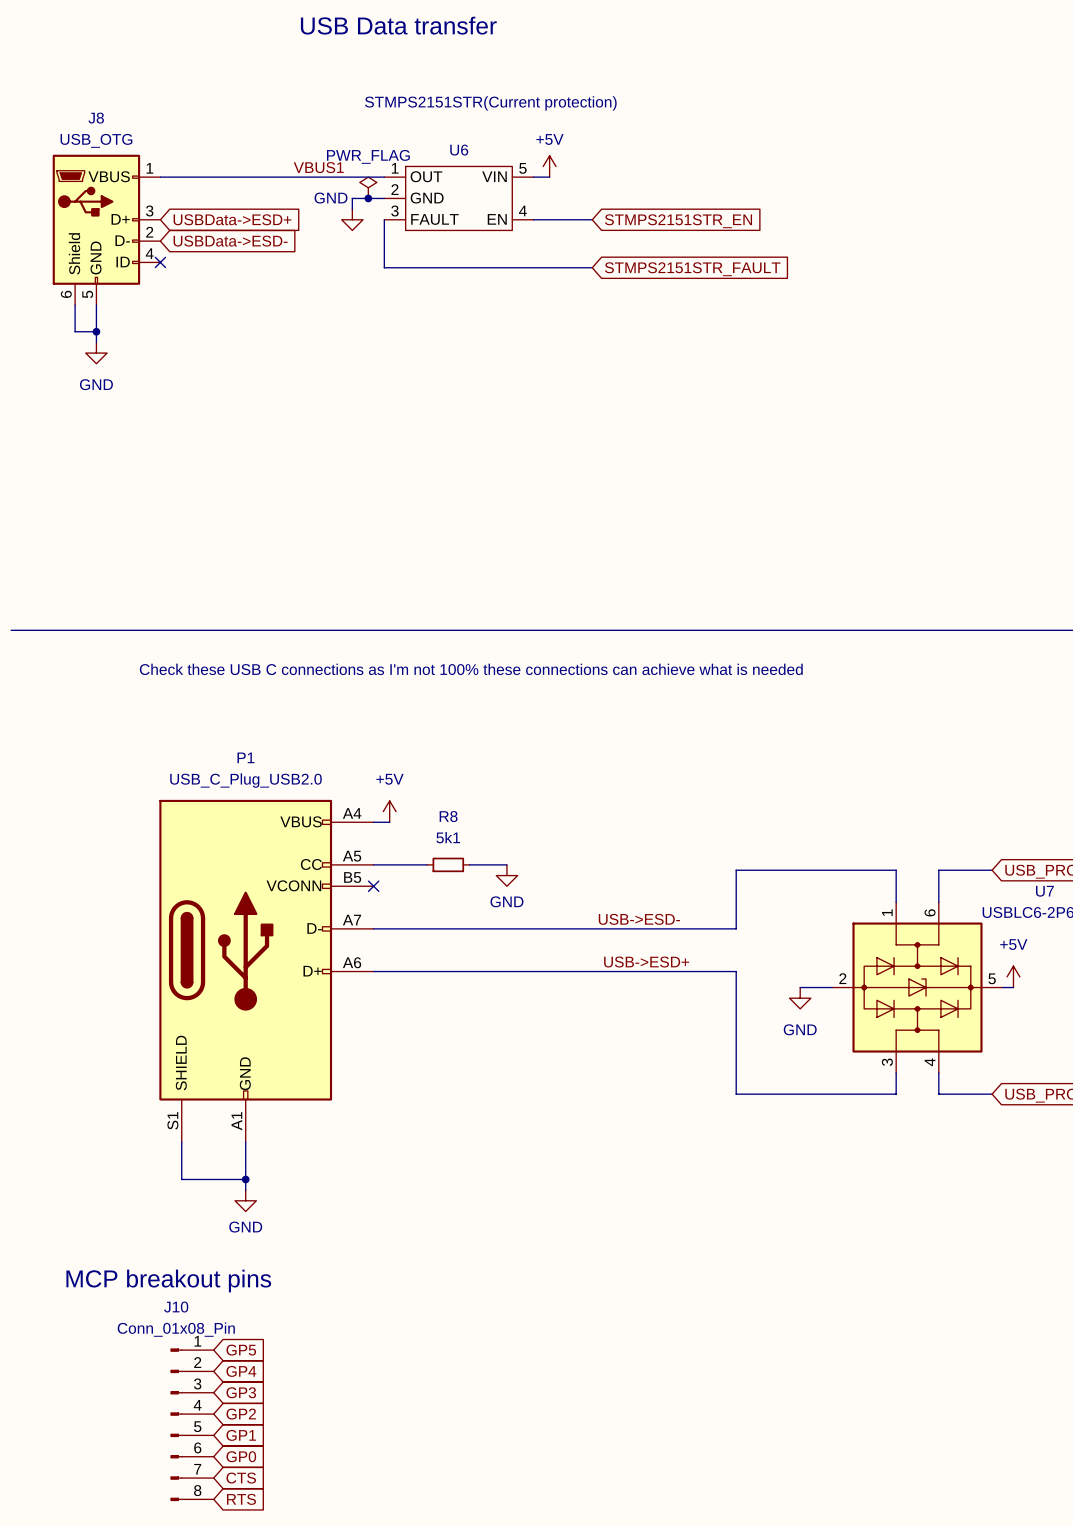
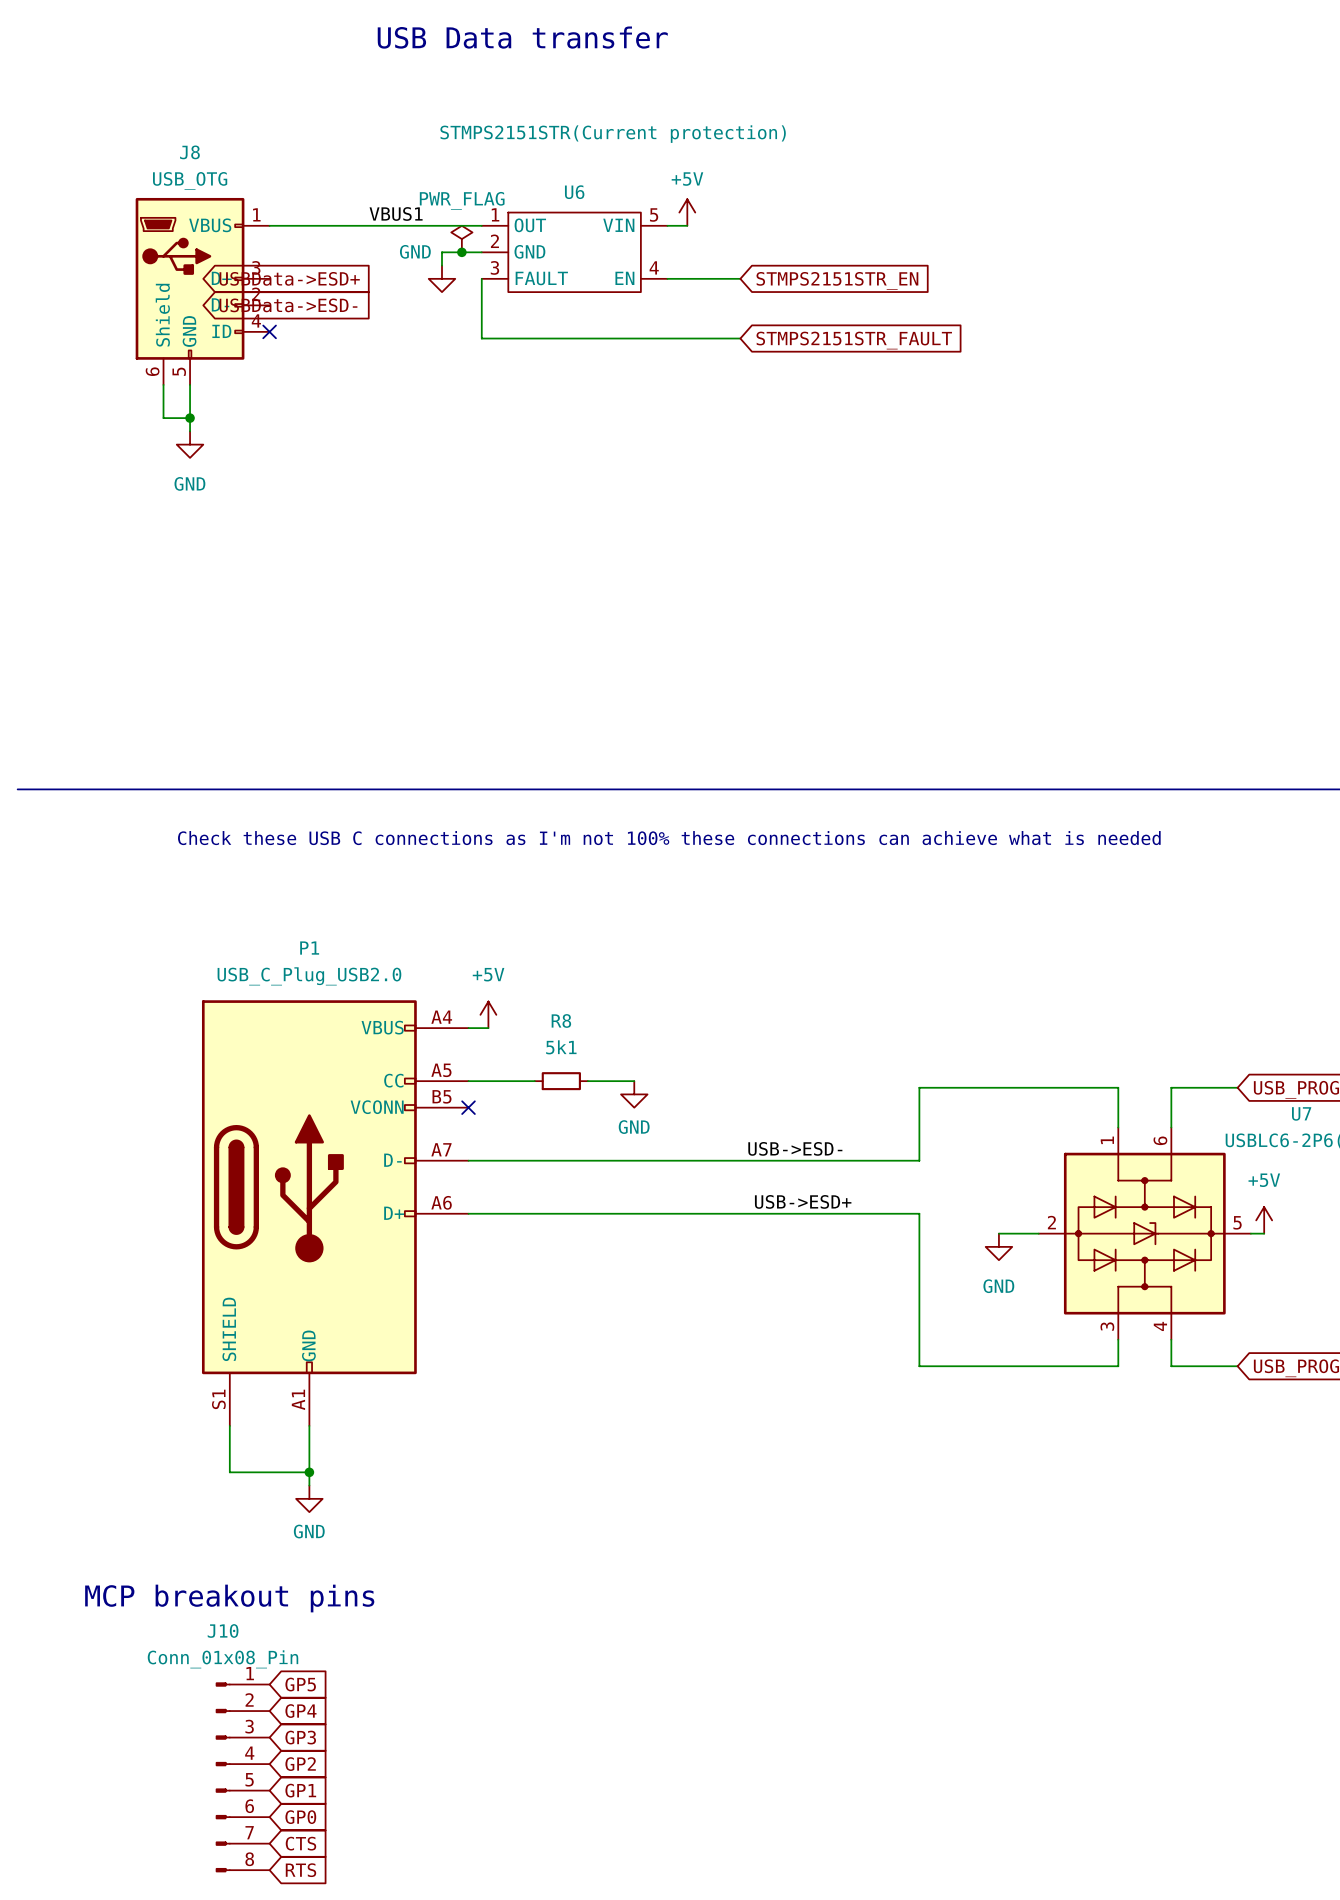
J8 position: (106, 229) -> (202, 291)
no-connect mark: (160, 262) -> none
no-connect mark: none -> (269, 331)
wire: (75, 305) (75, 331) (96, 331) -> (163, 384) (163, 418) (190, 418)
wire: (96, 305) (96, 342) -> (190, 384) (190, 431)
junction: (96, 331) -> none
junction: none -> (190, 418)
power symbol position: GND (96, 353) -> GND (190, 444)

